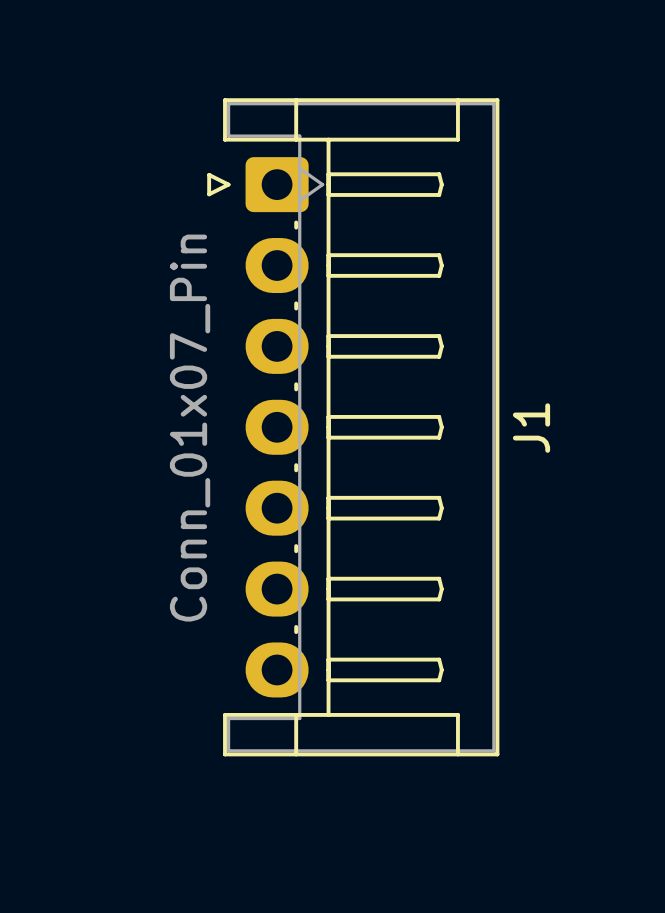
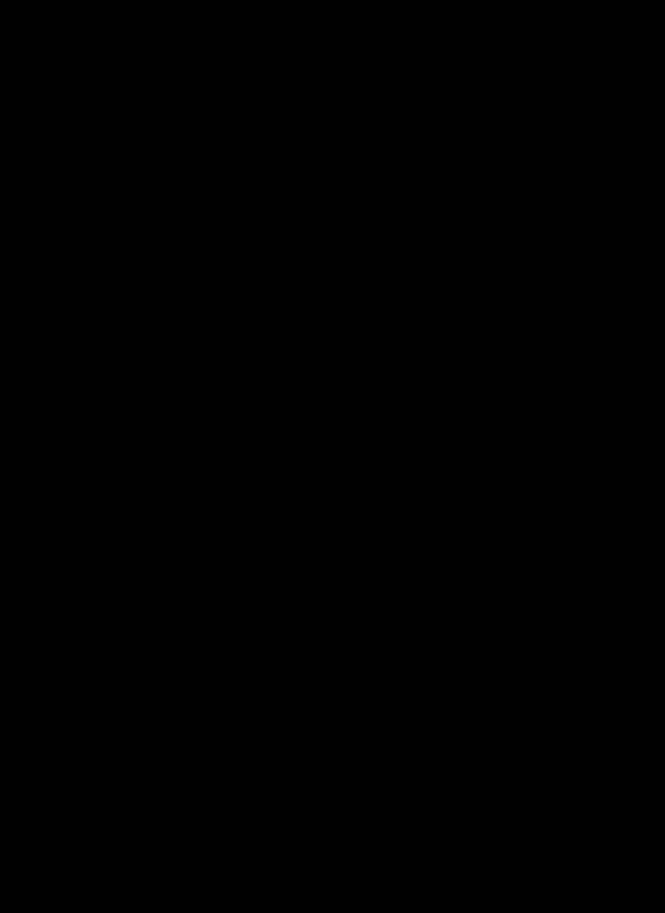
J1: Conn_01x07_Pin (353, 427) -> none

